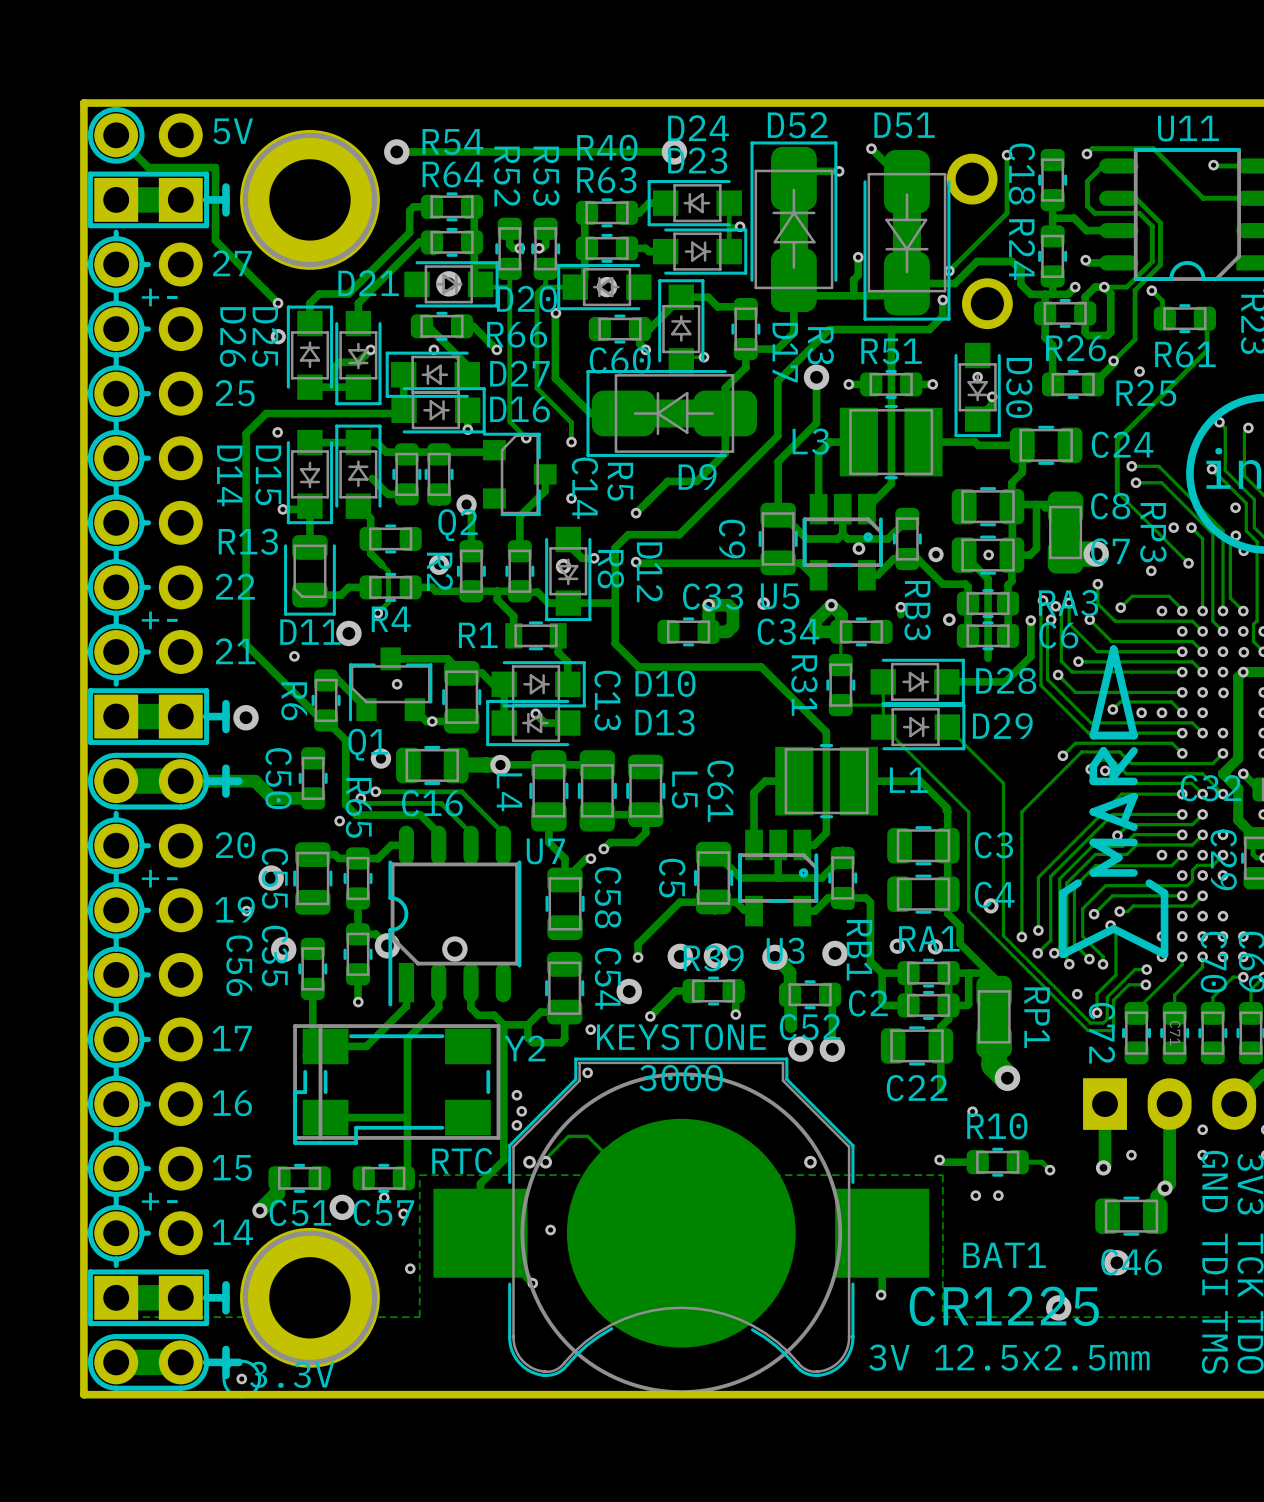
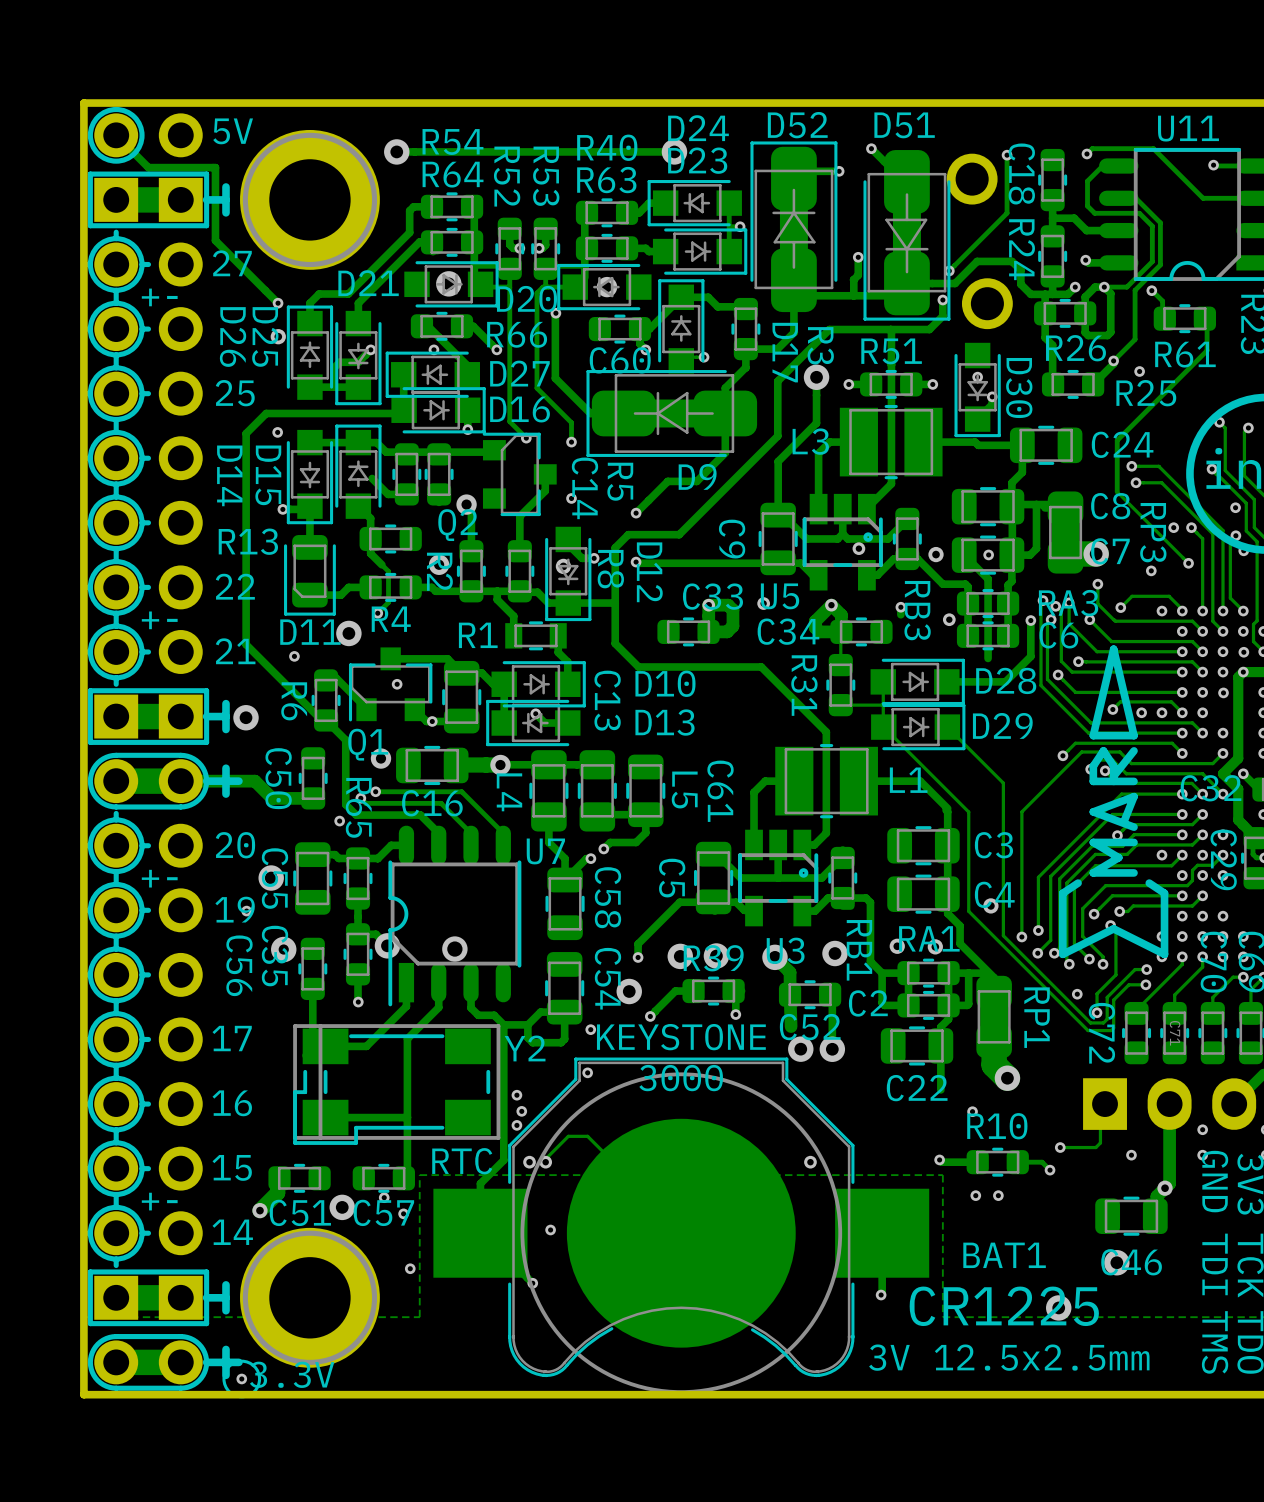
track: none -> (1100, 1104) (1100, 1142) (1095, 1147) (1060, 1147)
track: (1105, 1104) (1103, 1167) -> none
via: none -> (1060, 1147)
via: (1103, 1167) -> none

